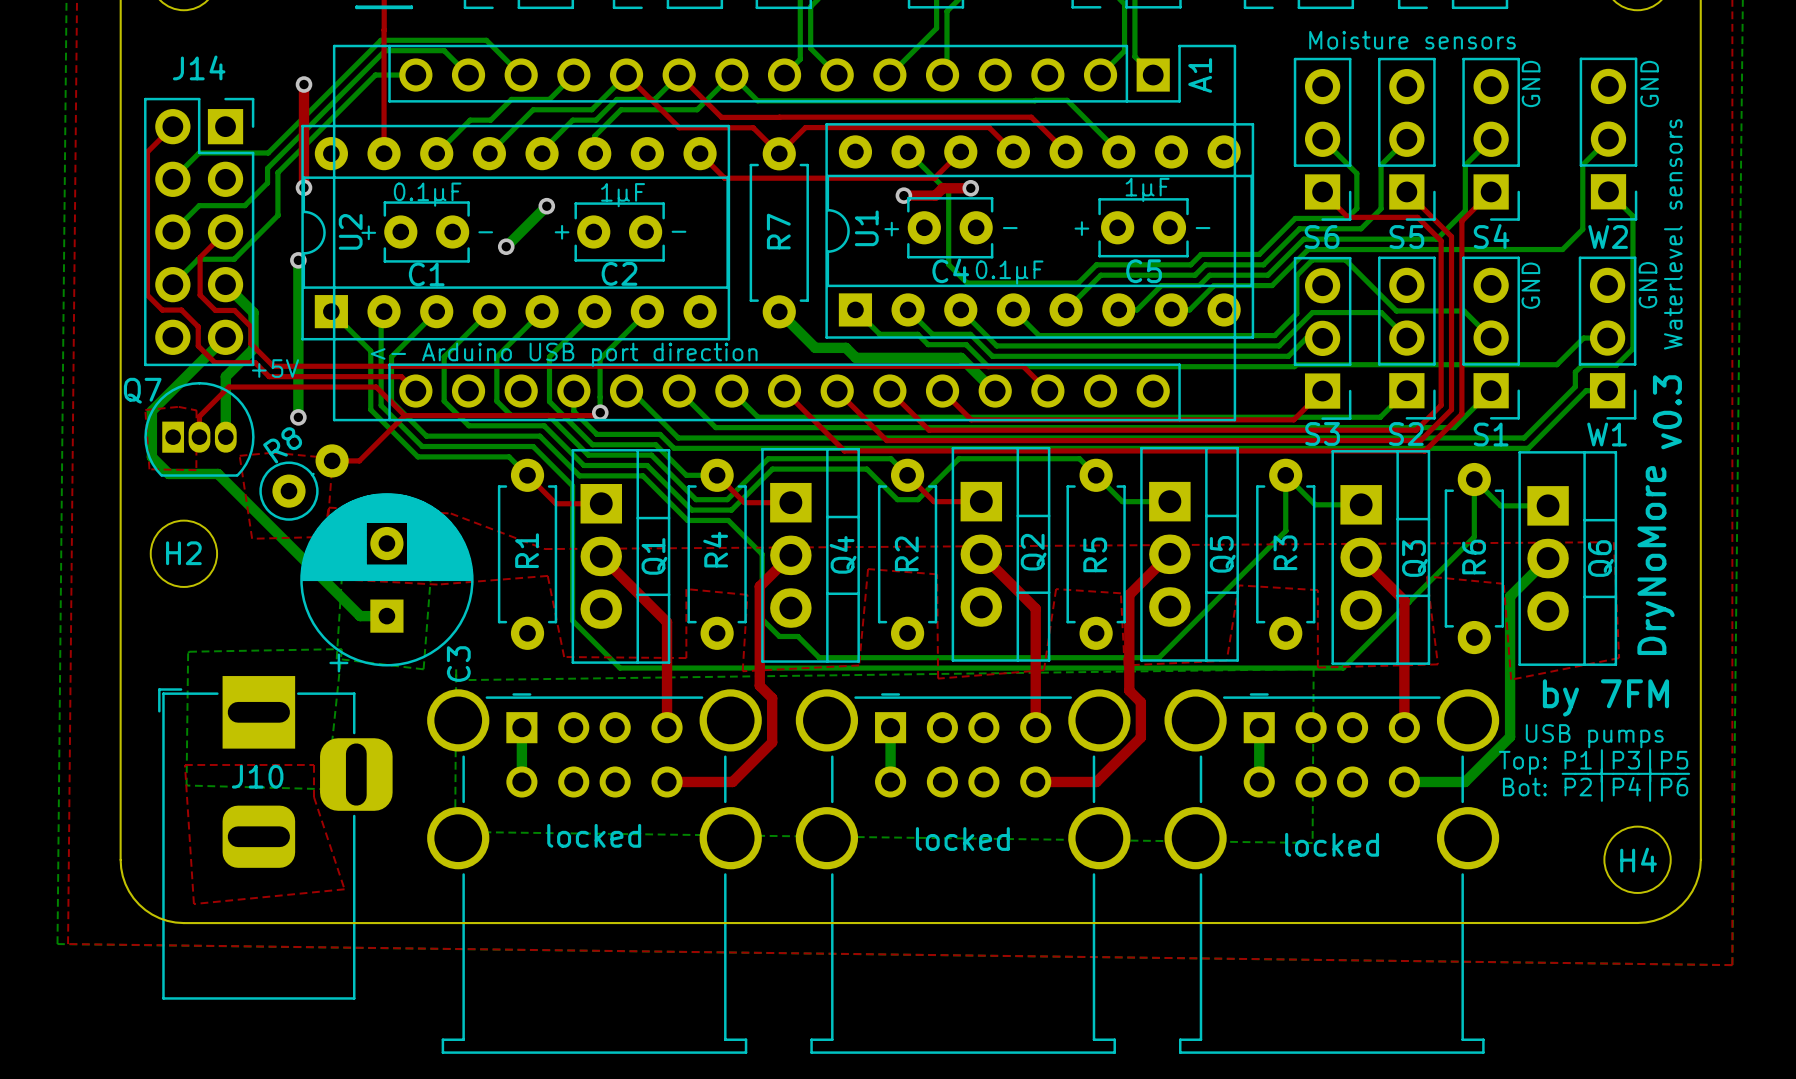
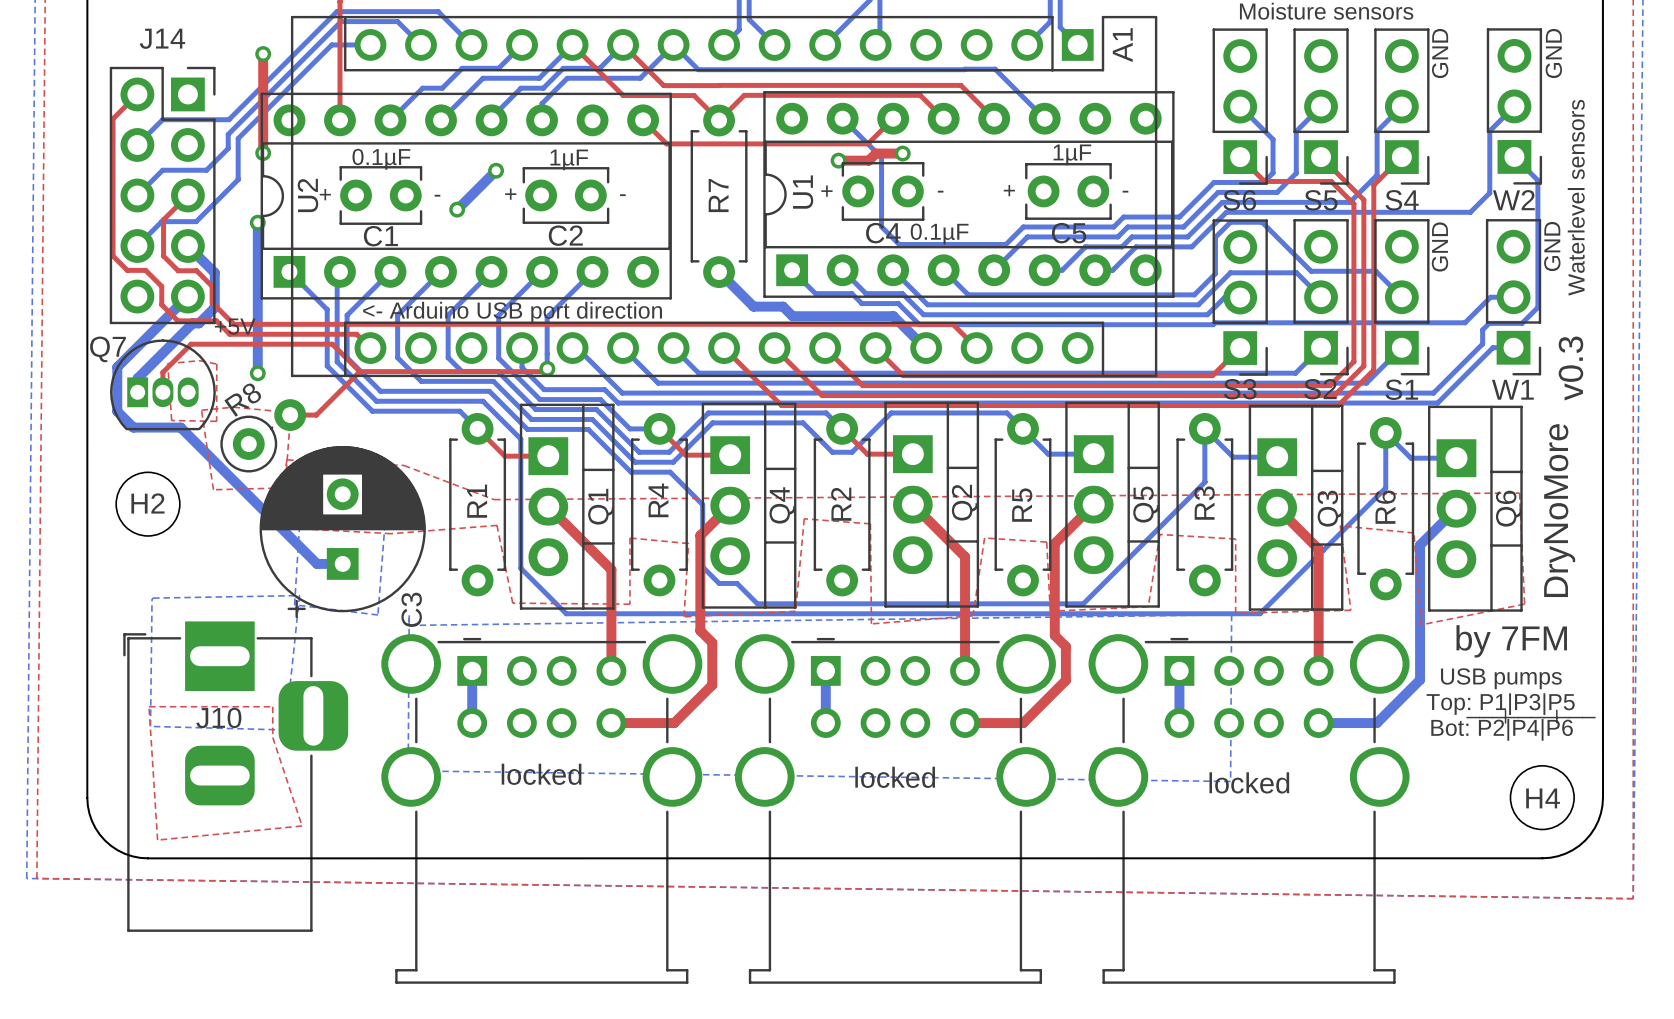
bottom track: (237, 365) (225, 376) (225, 437) -> (199, 323) (192, 323) (137, 378) (137, 392)
top zone outline: (178, 406) (145, 410) (149, 469) (196, 470) (196, 410) (178, 406) -> (199, 360) (167, 363) (171, 420) (216, 421) (216, 364) (199, 360)

